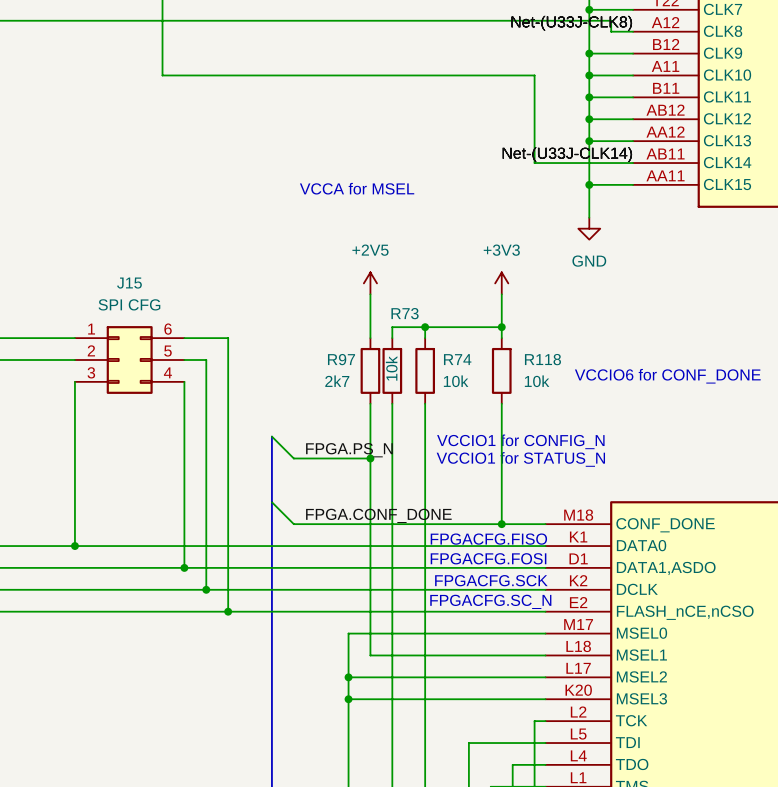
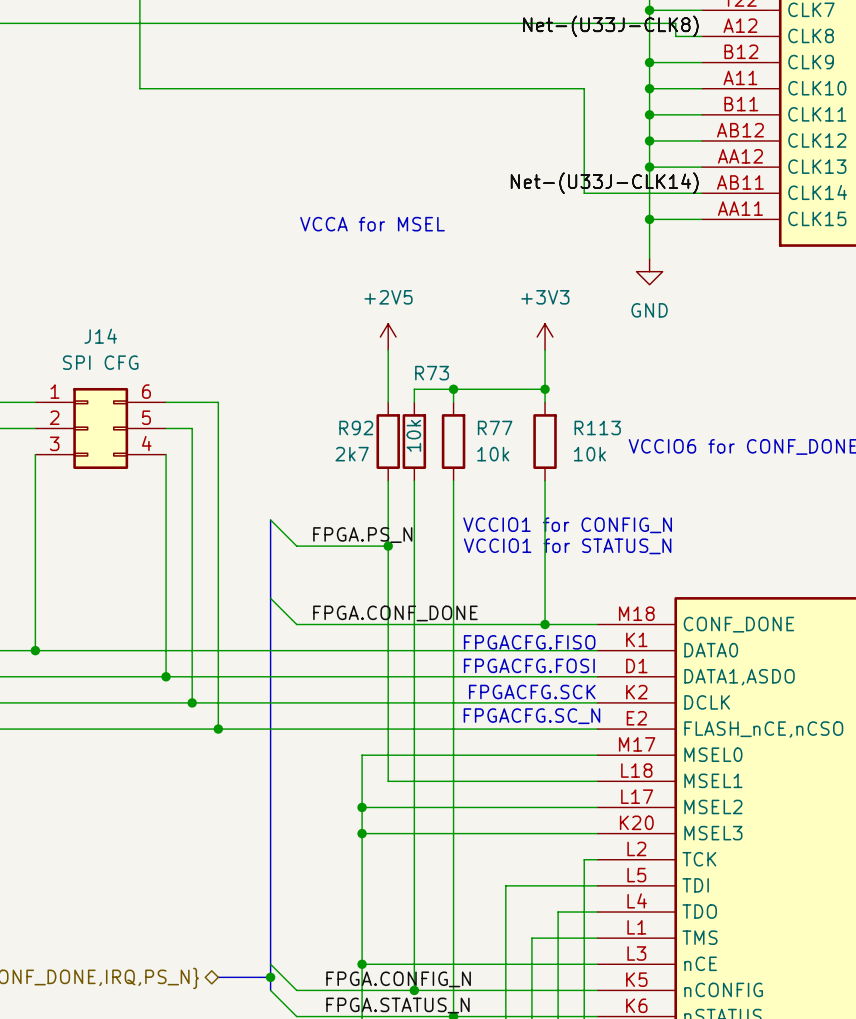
J15 name: J15 (129, 283) -> J14 (100, 336)
R97 name: R97 (341, 359) -> R92 (356, 427)
R74 name: R74 (457, 359) -> R77 (495, 427)
R118 name: R118 (542, 359) -> R113 (597, 427)

